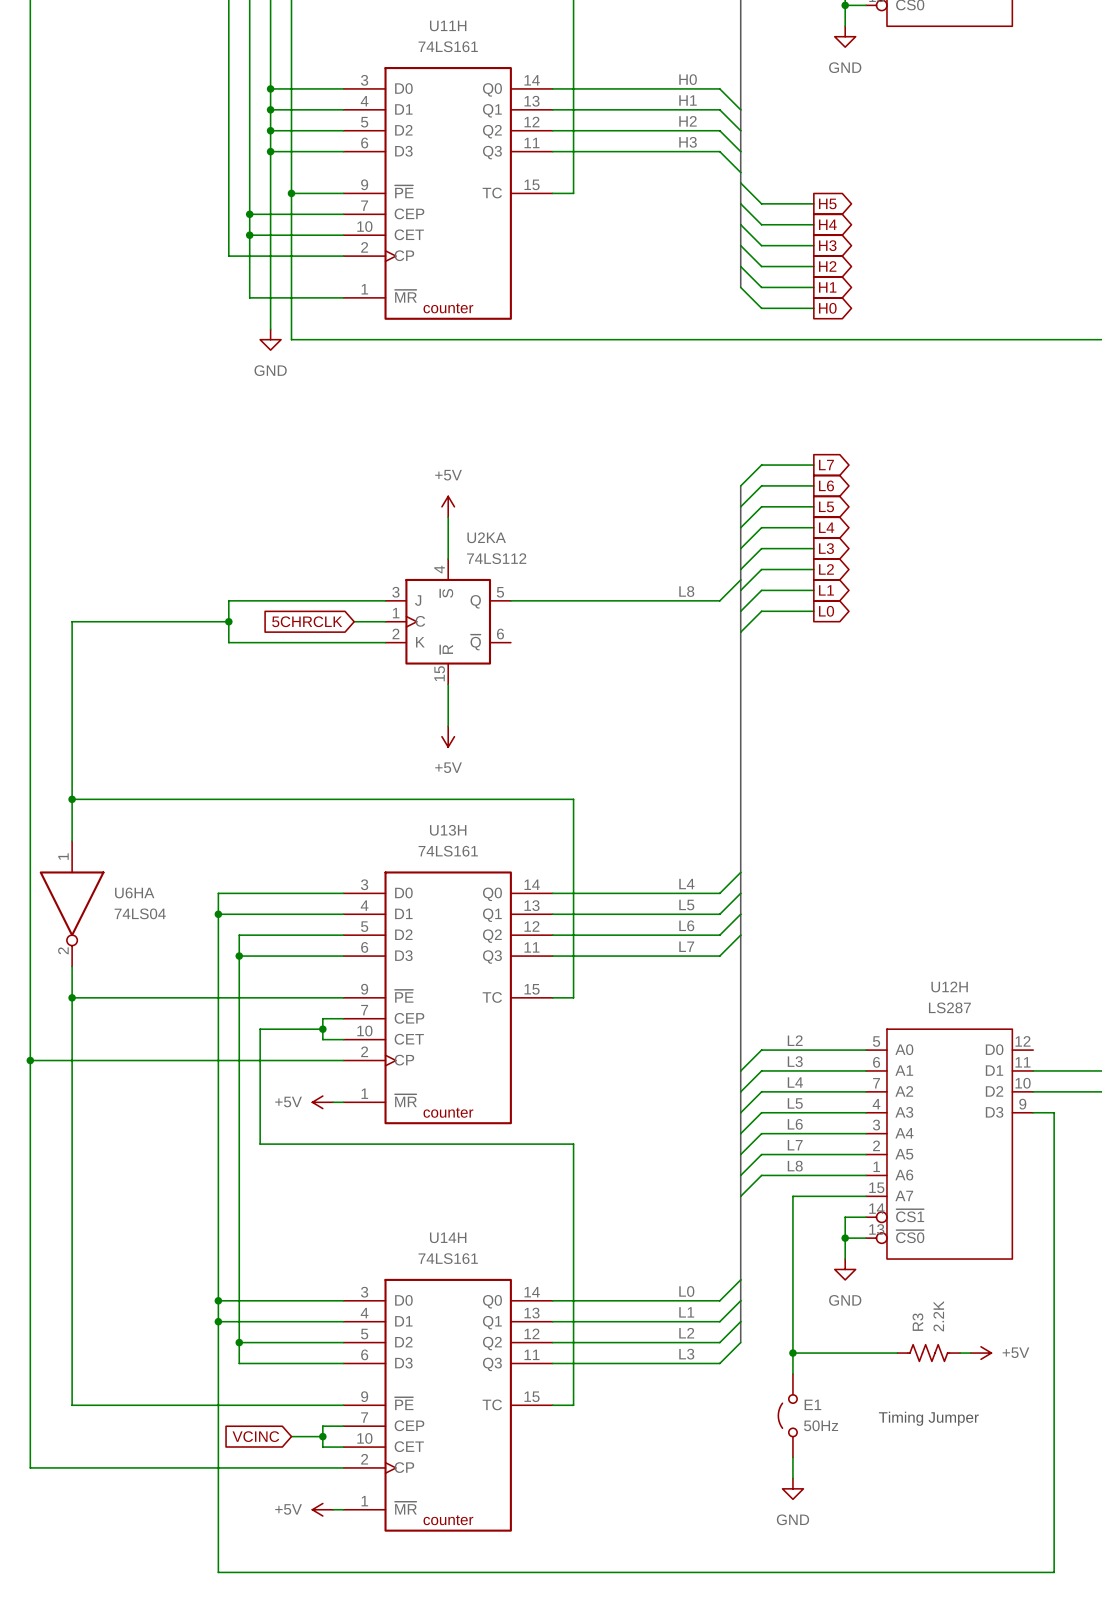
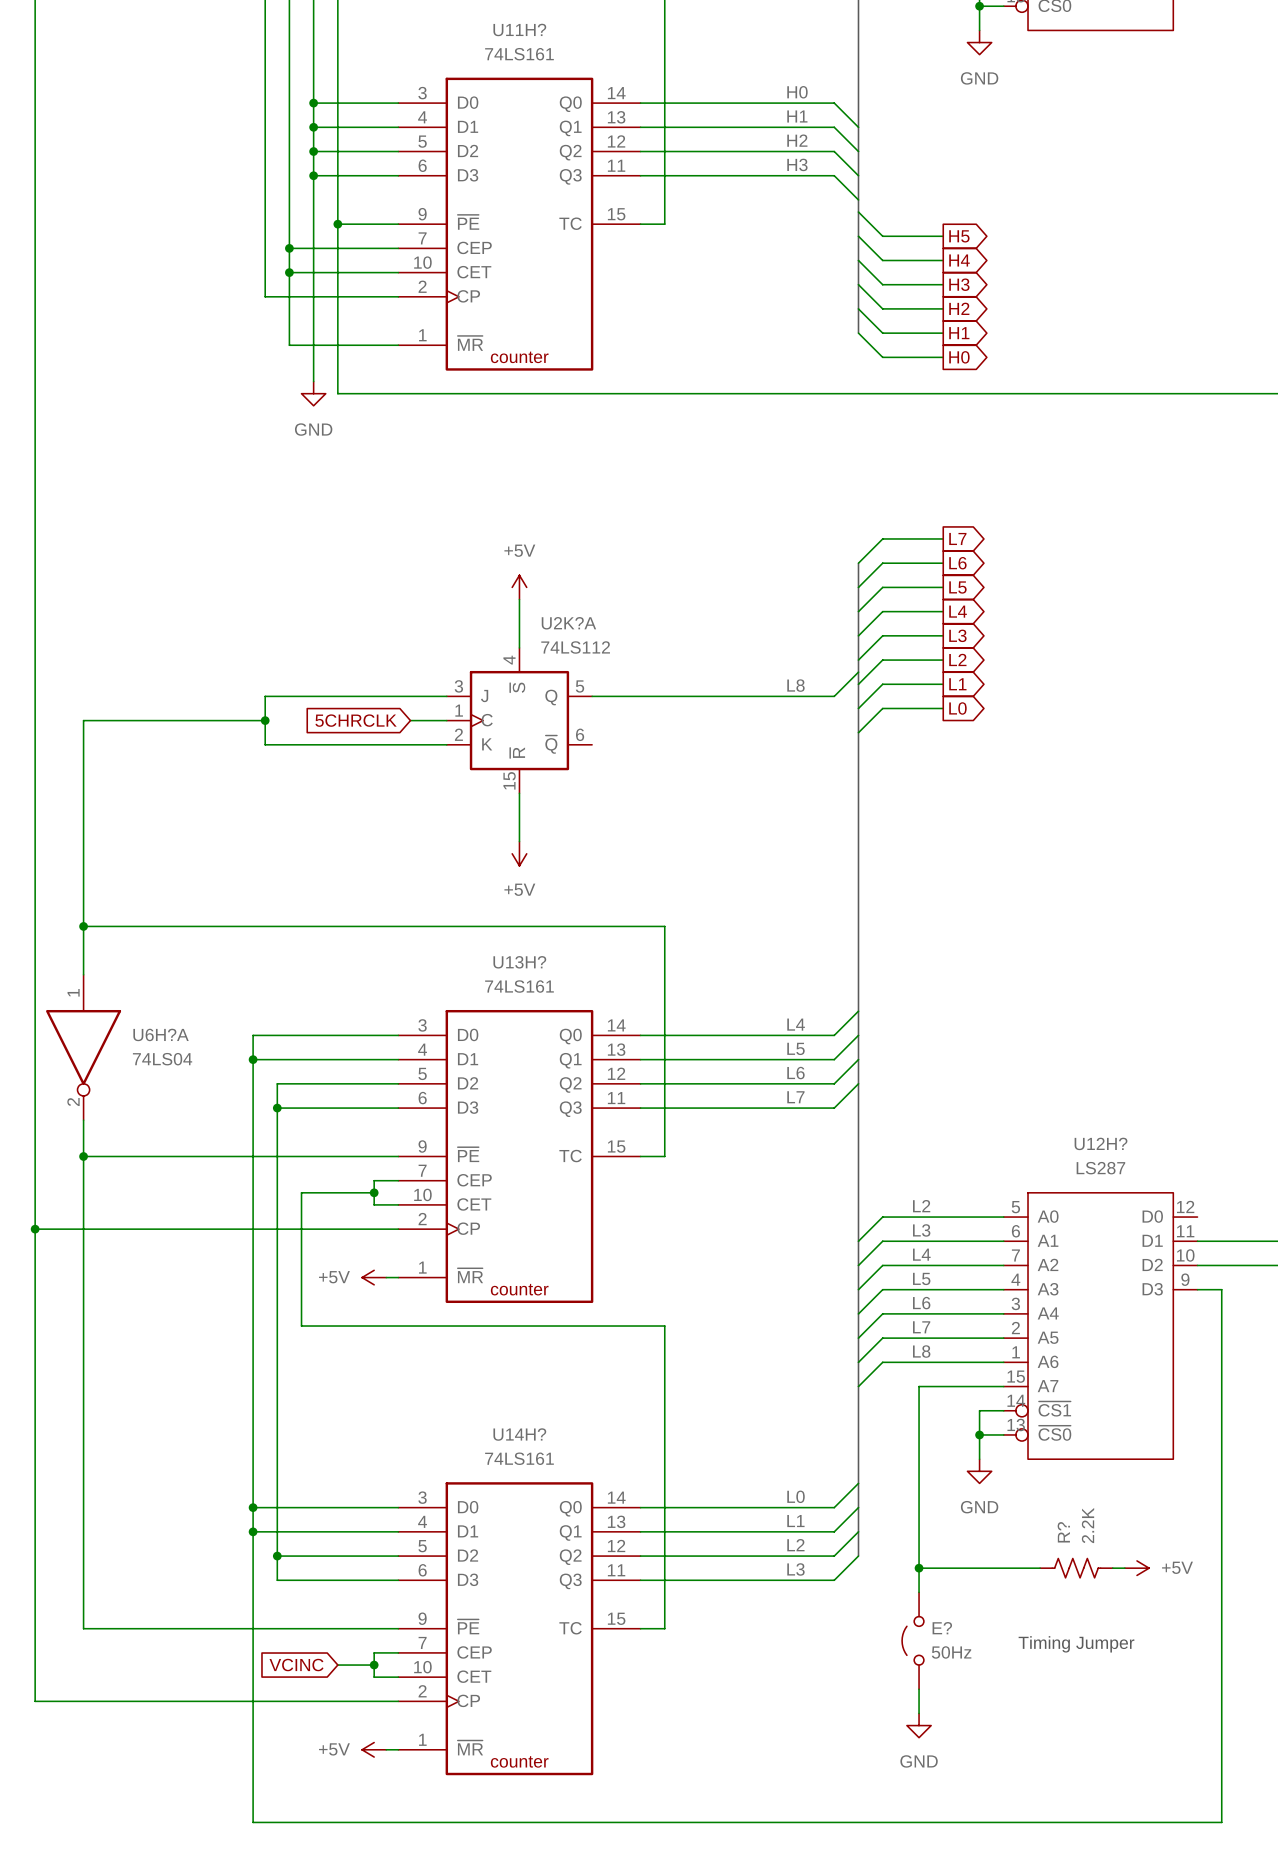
U11H name: U11H (448, 25) -> U11H? (519, 29)
U2KA name: U2KA (486, 537) -> U2K?A (568, 623)
U13H name: U13H (448, 830) -> U13H? (519, 962)
U6HA name: U6HA (134, 892) -> U6H?A (161, 1034)
U12H name: U12H (949, 987) -> U12H? (1101, 1143)
U14H name: U14H (448, 1237) -> U14H? (519, 1434)
R3 name: R3 (917, 1322) -> R? (1063, 1532)
E1 name: E1 (812, 1404) -> E? (942, 1628)

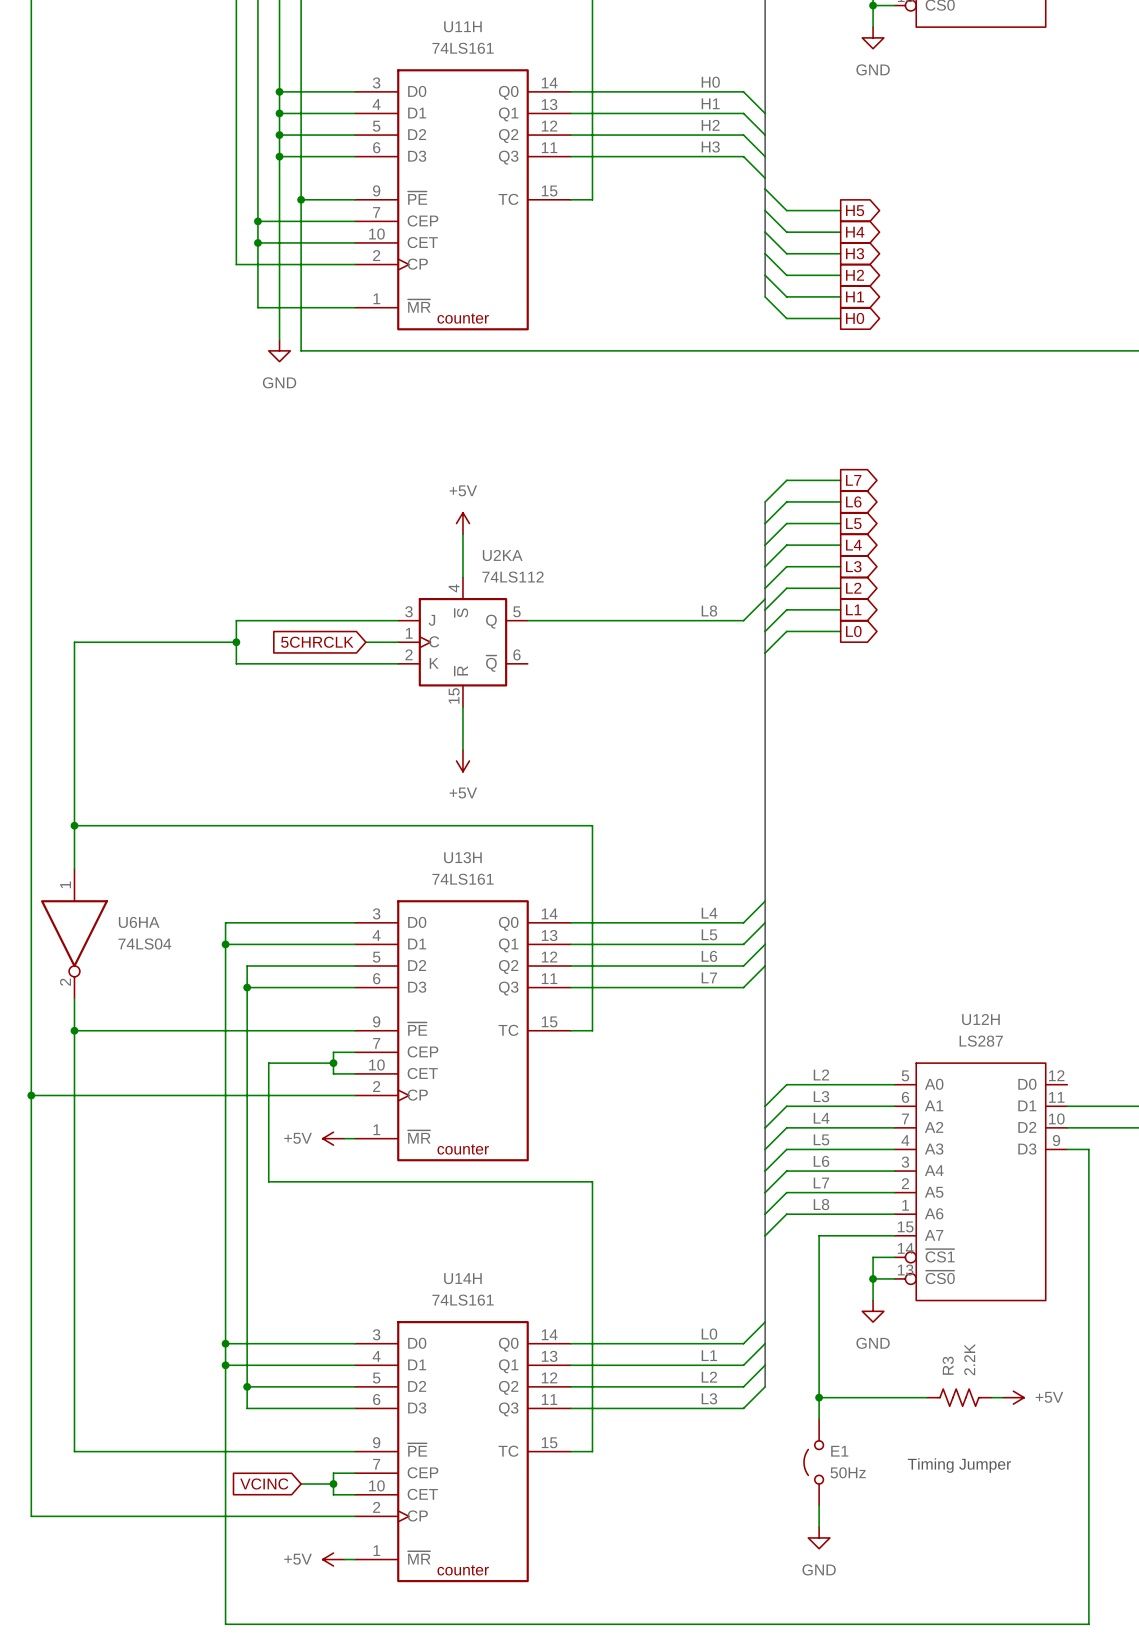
U11H? name: U11H? (519, 29) -> U11H (462, 26)
U2K?A name: U2K?A (568, 623) -> U2KA (502, 555)
U13H? name: U13H? (519, 962) -> U13H (462, 857)
U6H?A name: U6H?A (161, 1034) -> U6HA (139, 922)
U12H? name: U12H? (1101, 1143) -> U12H (980, 1019)
U14H? name: U14H? (519, 1434) -> U14H (462, 1278)
R? name: R? (1063, 1532) -> R3 (948, 1365)
E? name: E? (942, 1628) -> E1 (839, 1451)

